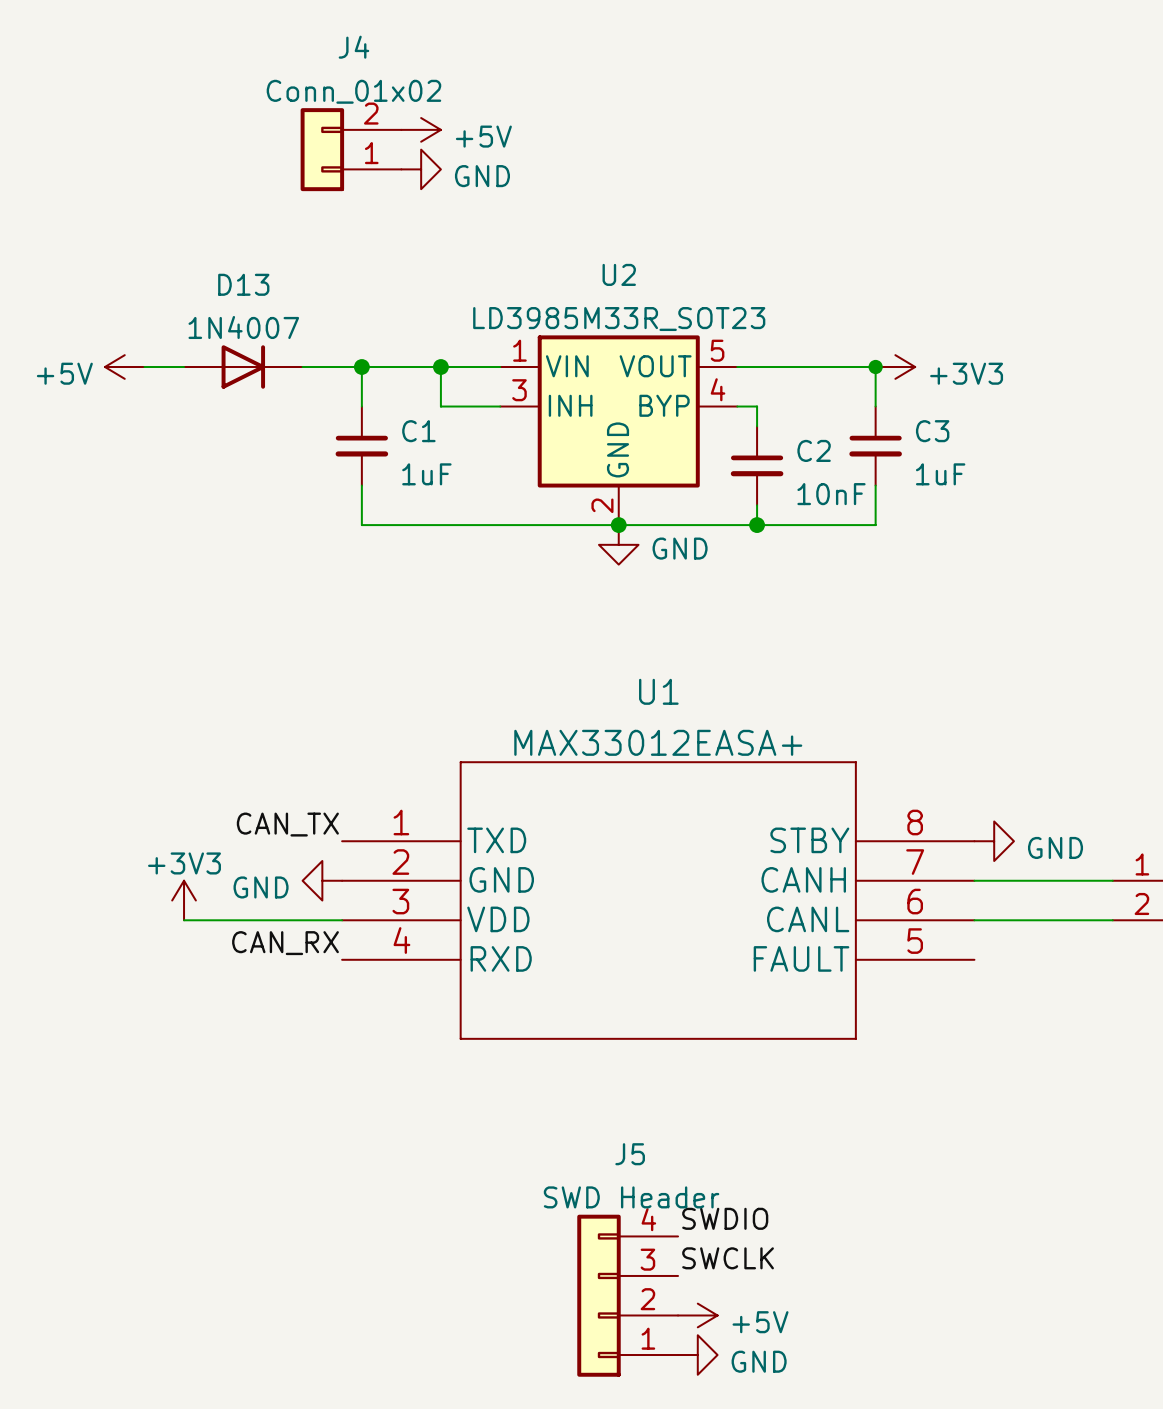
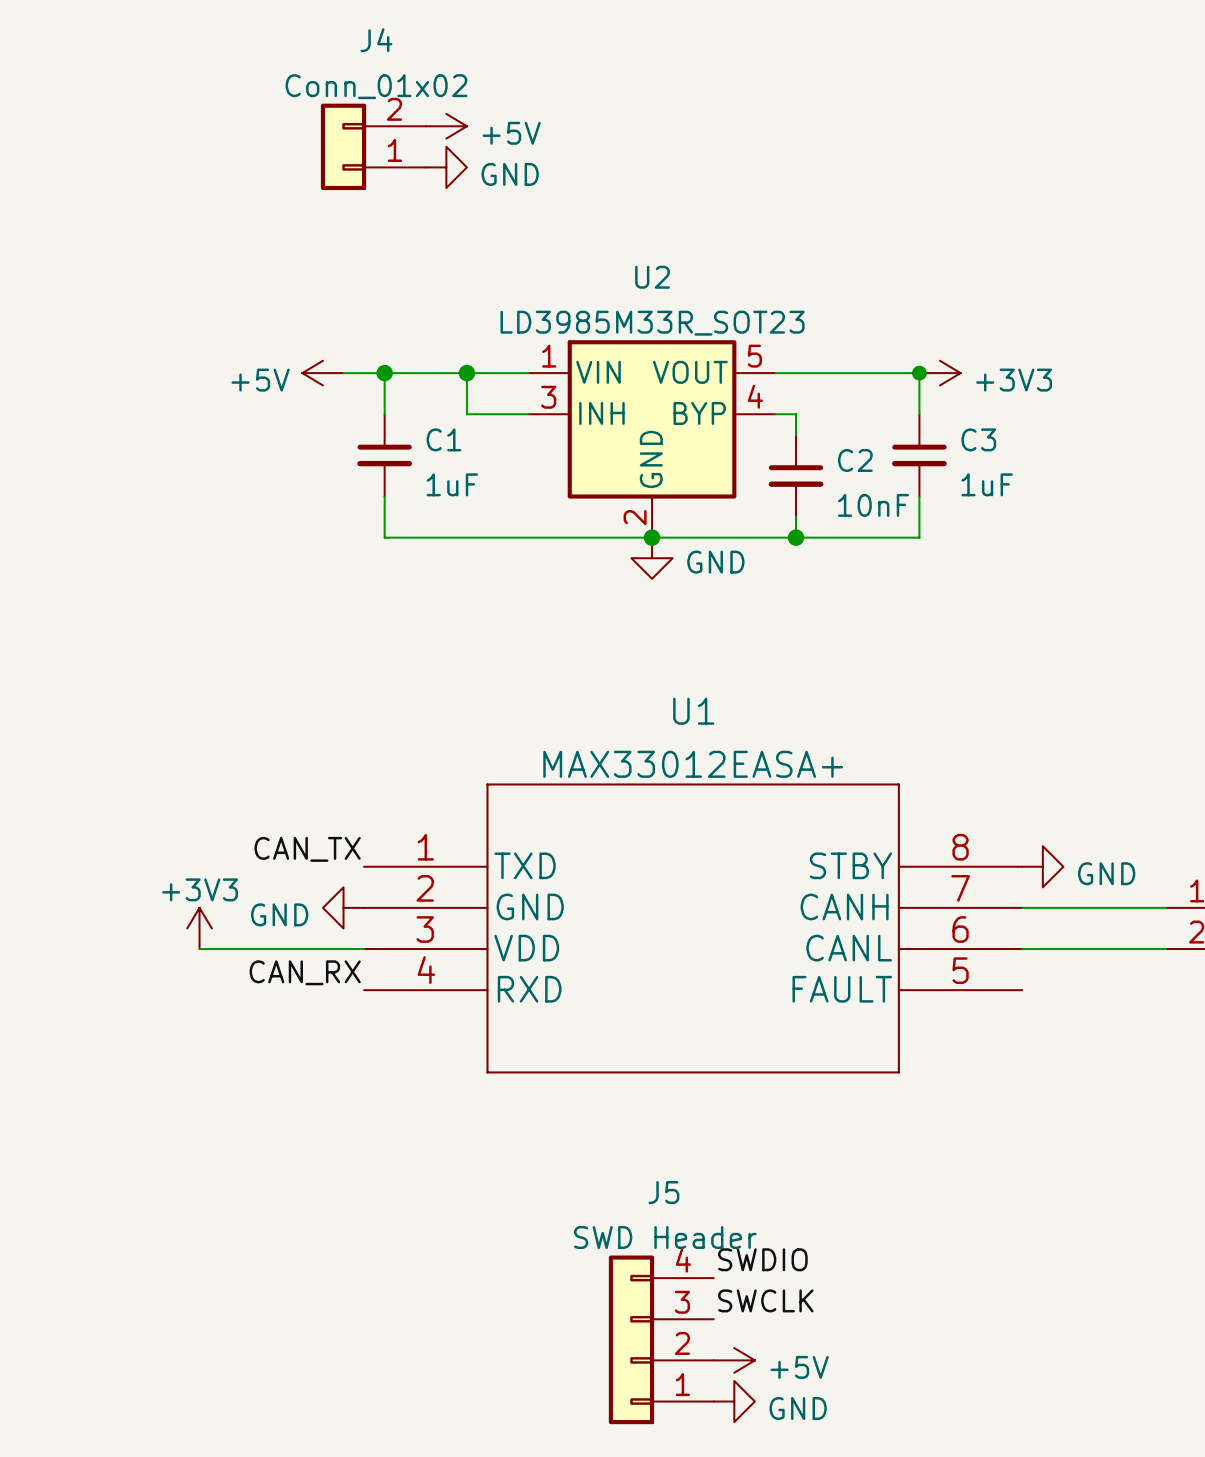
power symbol position: +5V (124, 367) -> +5V (322, 373)
wire: (144, 367) (184, 367) -> none
D13: 1N4007 (243, 367) -> none

